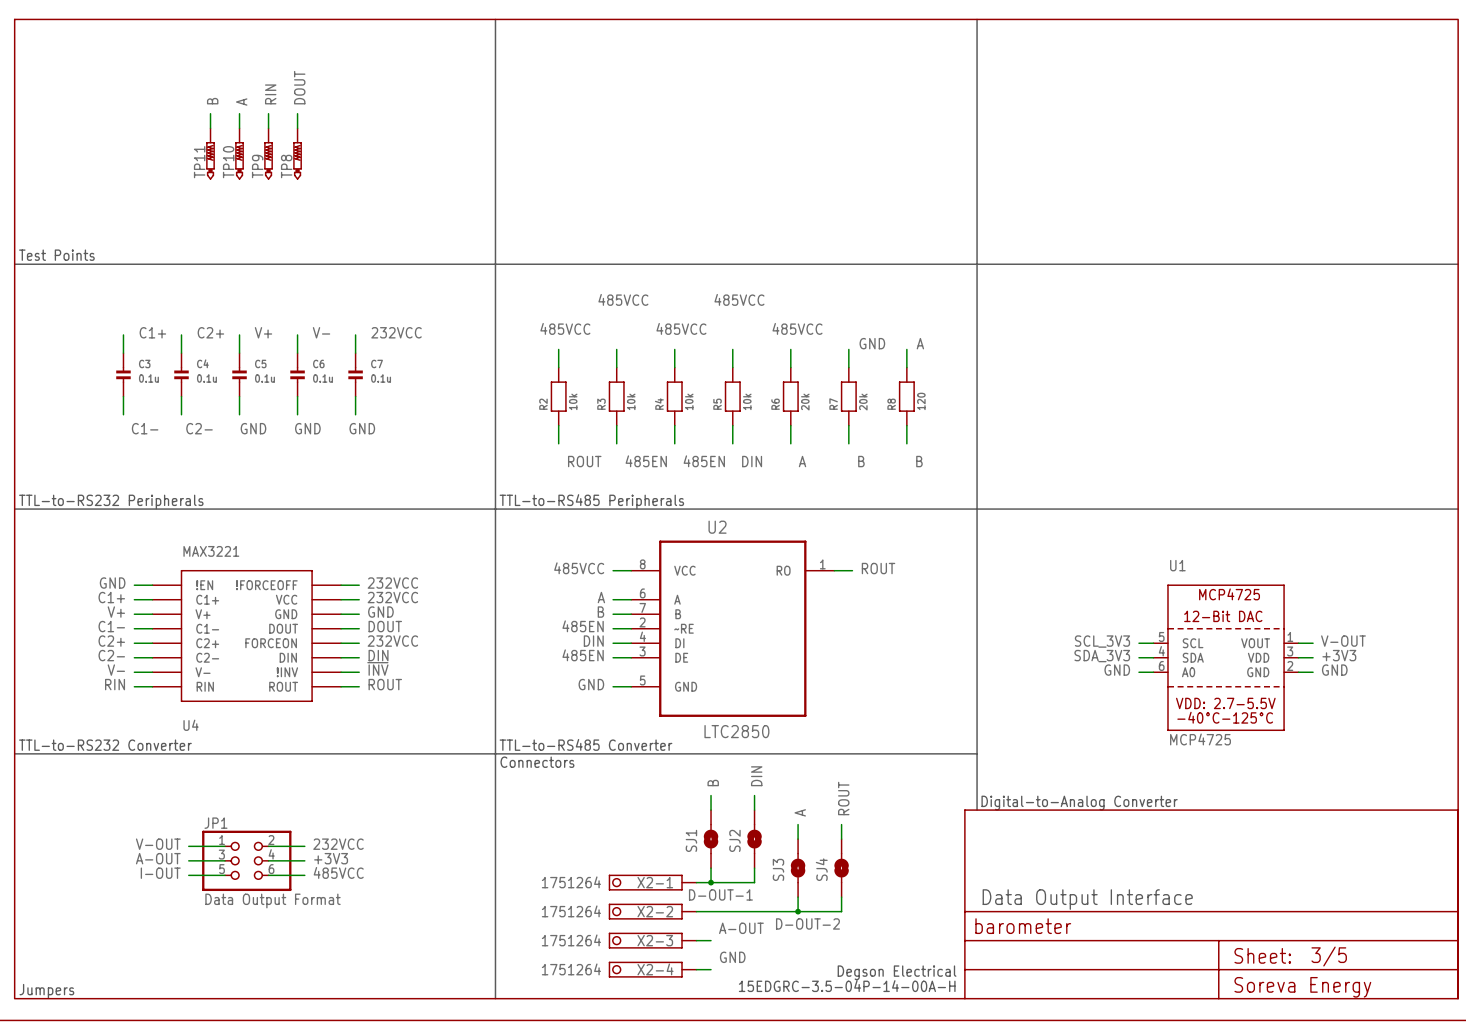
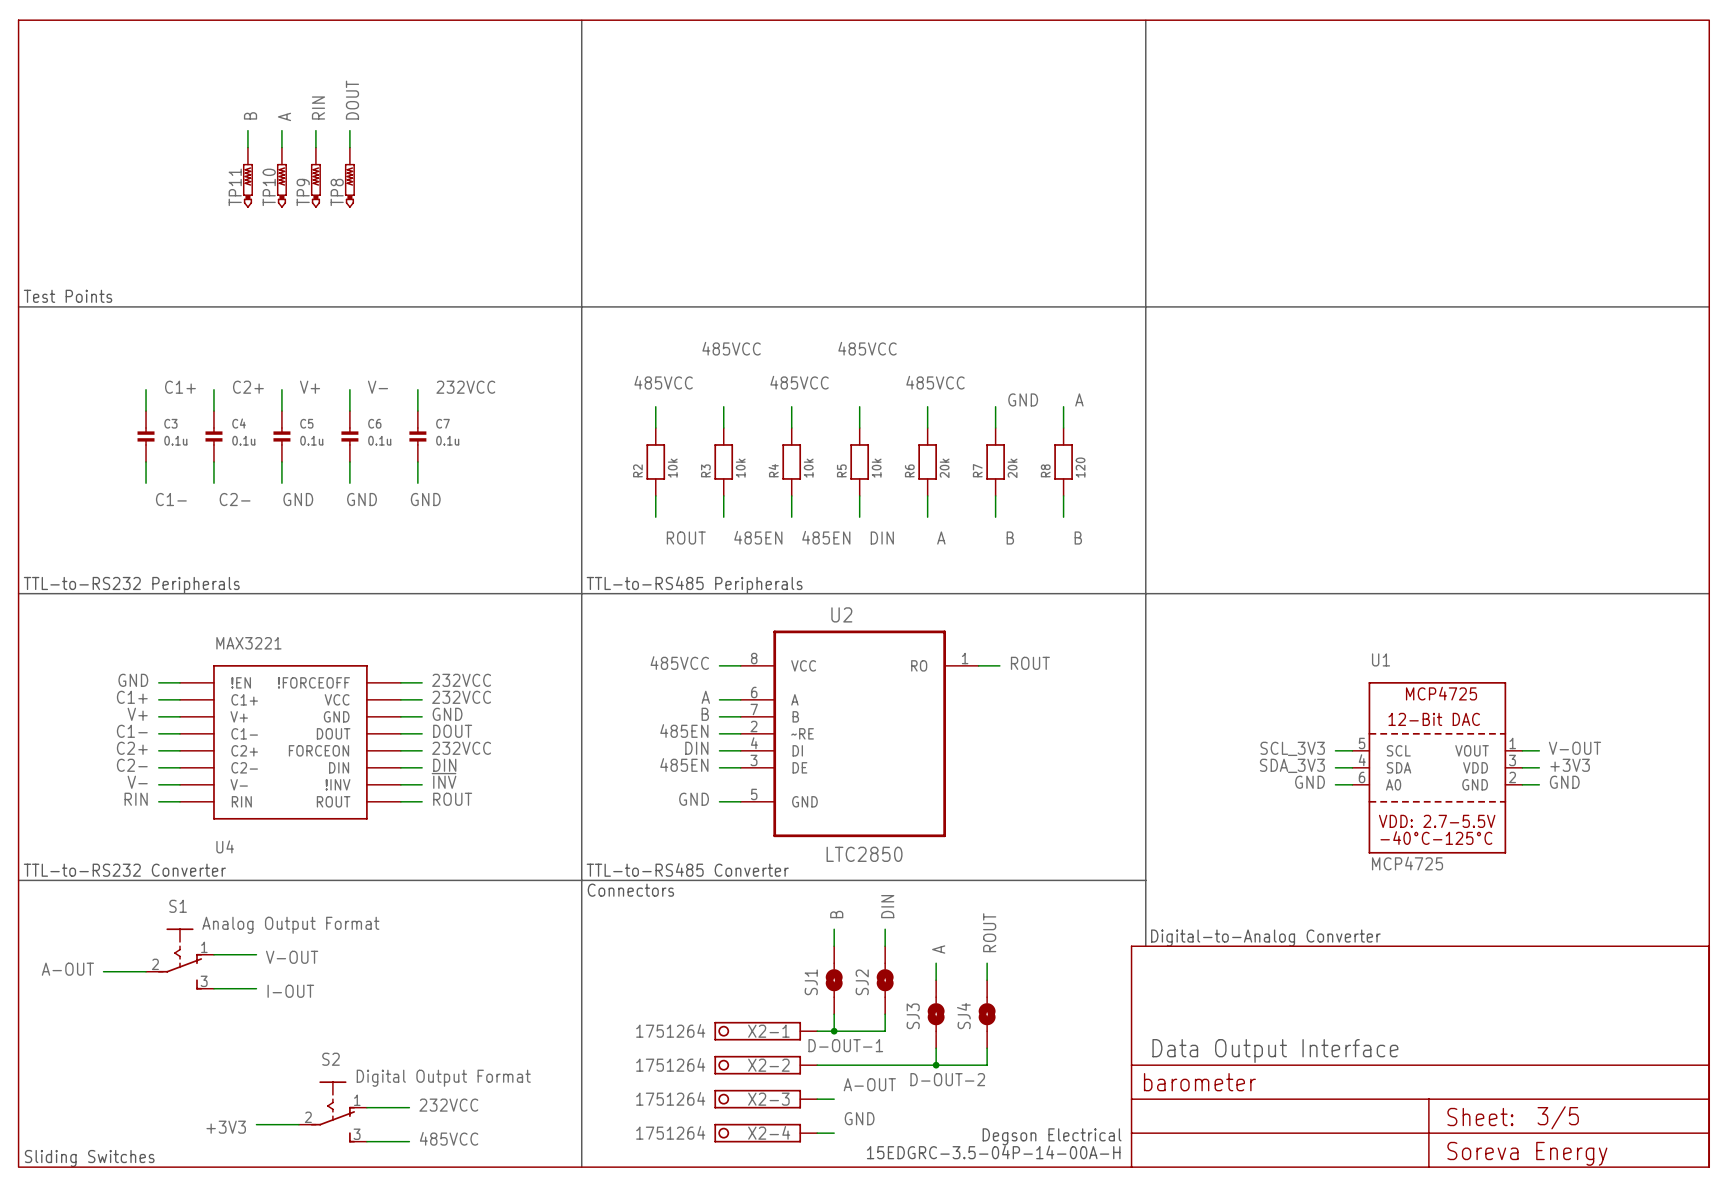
S1: none -> Analog Output Format (180, 958)
wire: none -> (103, 971) (146, 971)
label position: V-OUT (158, 844) -> V-OUT (292, 957)
label position: 232VCC (338, 844) -> 232VCC (448, 1105)
wire: (217, 846) (225, 846) -> (213, 988) (222, 988)
wire: (268, 846) (304, 846) -> (366, 1107) (409, 1107)
label position: A-OUT (158, 858) -> A-OUT (67, 969)
label: +3V3 (331, 858) -> none
wire: (188, 860) (225, 860) -> (213, 954) (256, 954)
JP1: Data Output Format (246, 860) -> none
wire: (268, 860) (304, 860) -> none
label position: 485VCC (338, 872) -> 485VCC (449, 1138)
label position: I-OUT (160, 873) -> I-OUT (290, 991)
wire: (188, 875) (225, 875) -> (256, 1124) (298, 1124)
wire: (268, 875) (304, 875) -> (366, 1141) (409, 1141)
S2: none -> Digital Output Format (332, 1111)
label: none -> +3V3 (226, 1127)
text: Jumpers (46, 991) -> Sliding Switches (89, 1158)

